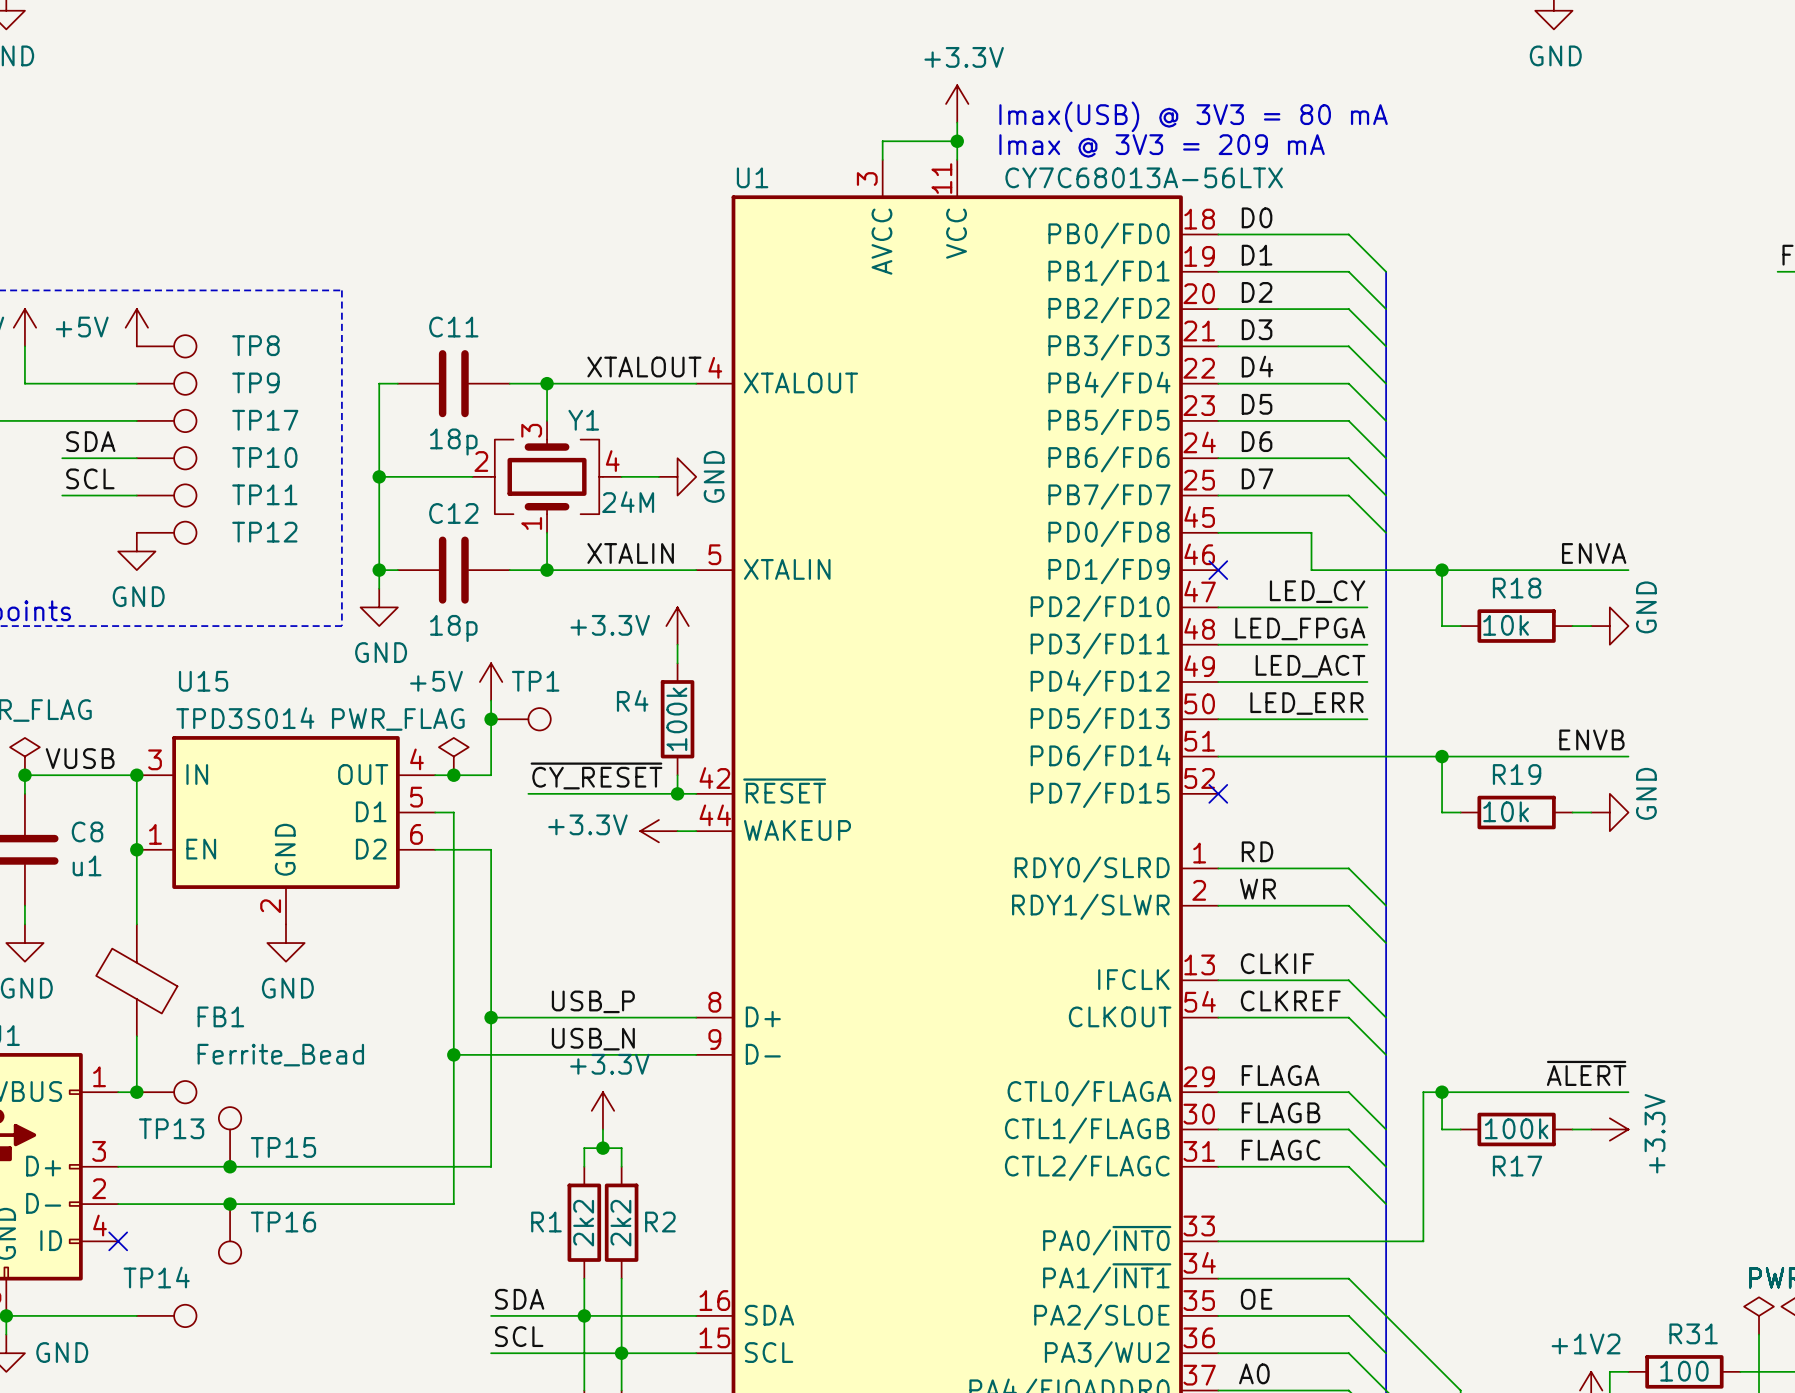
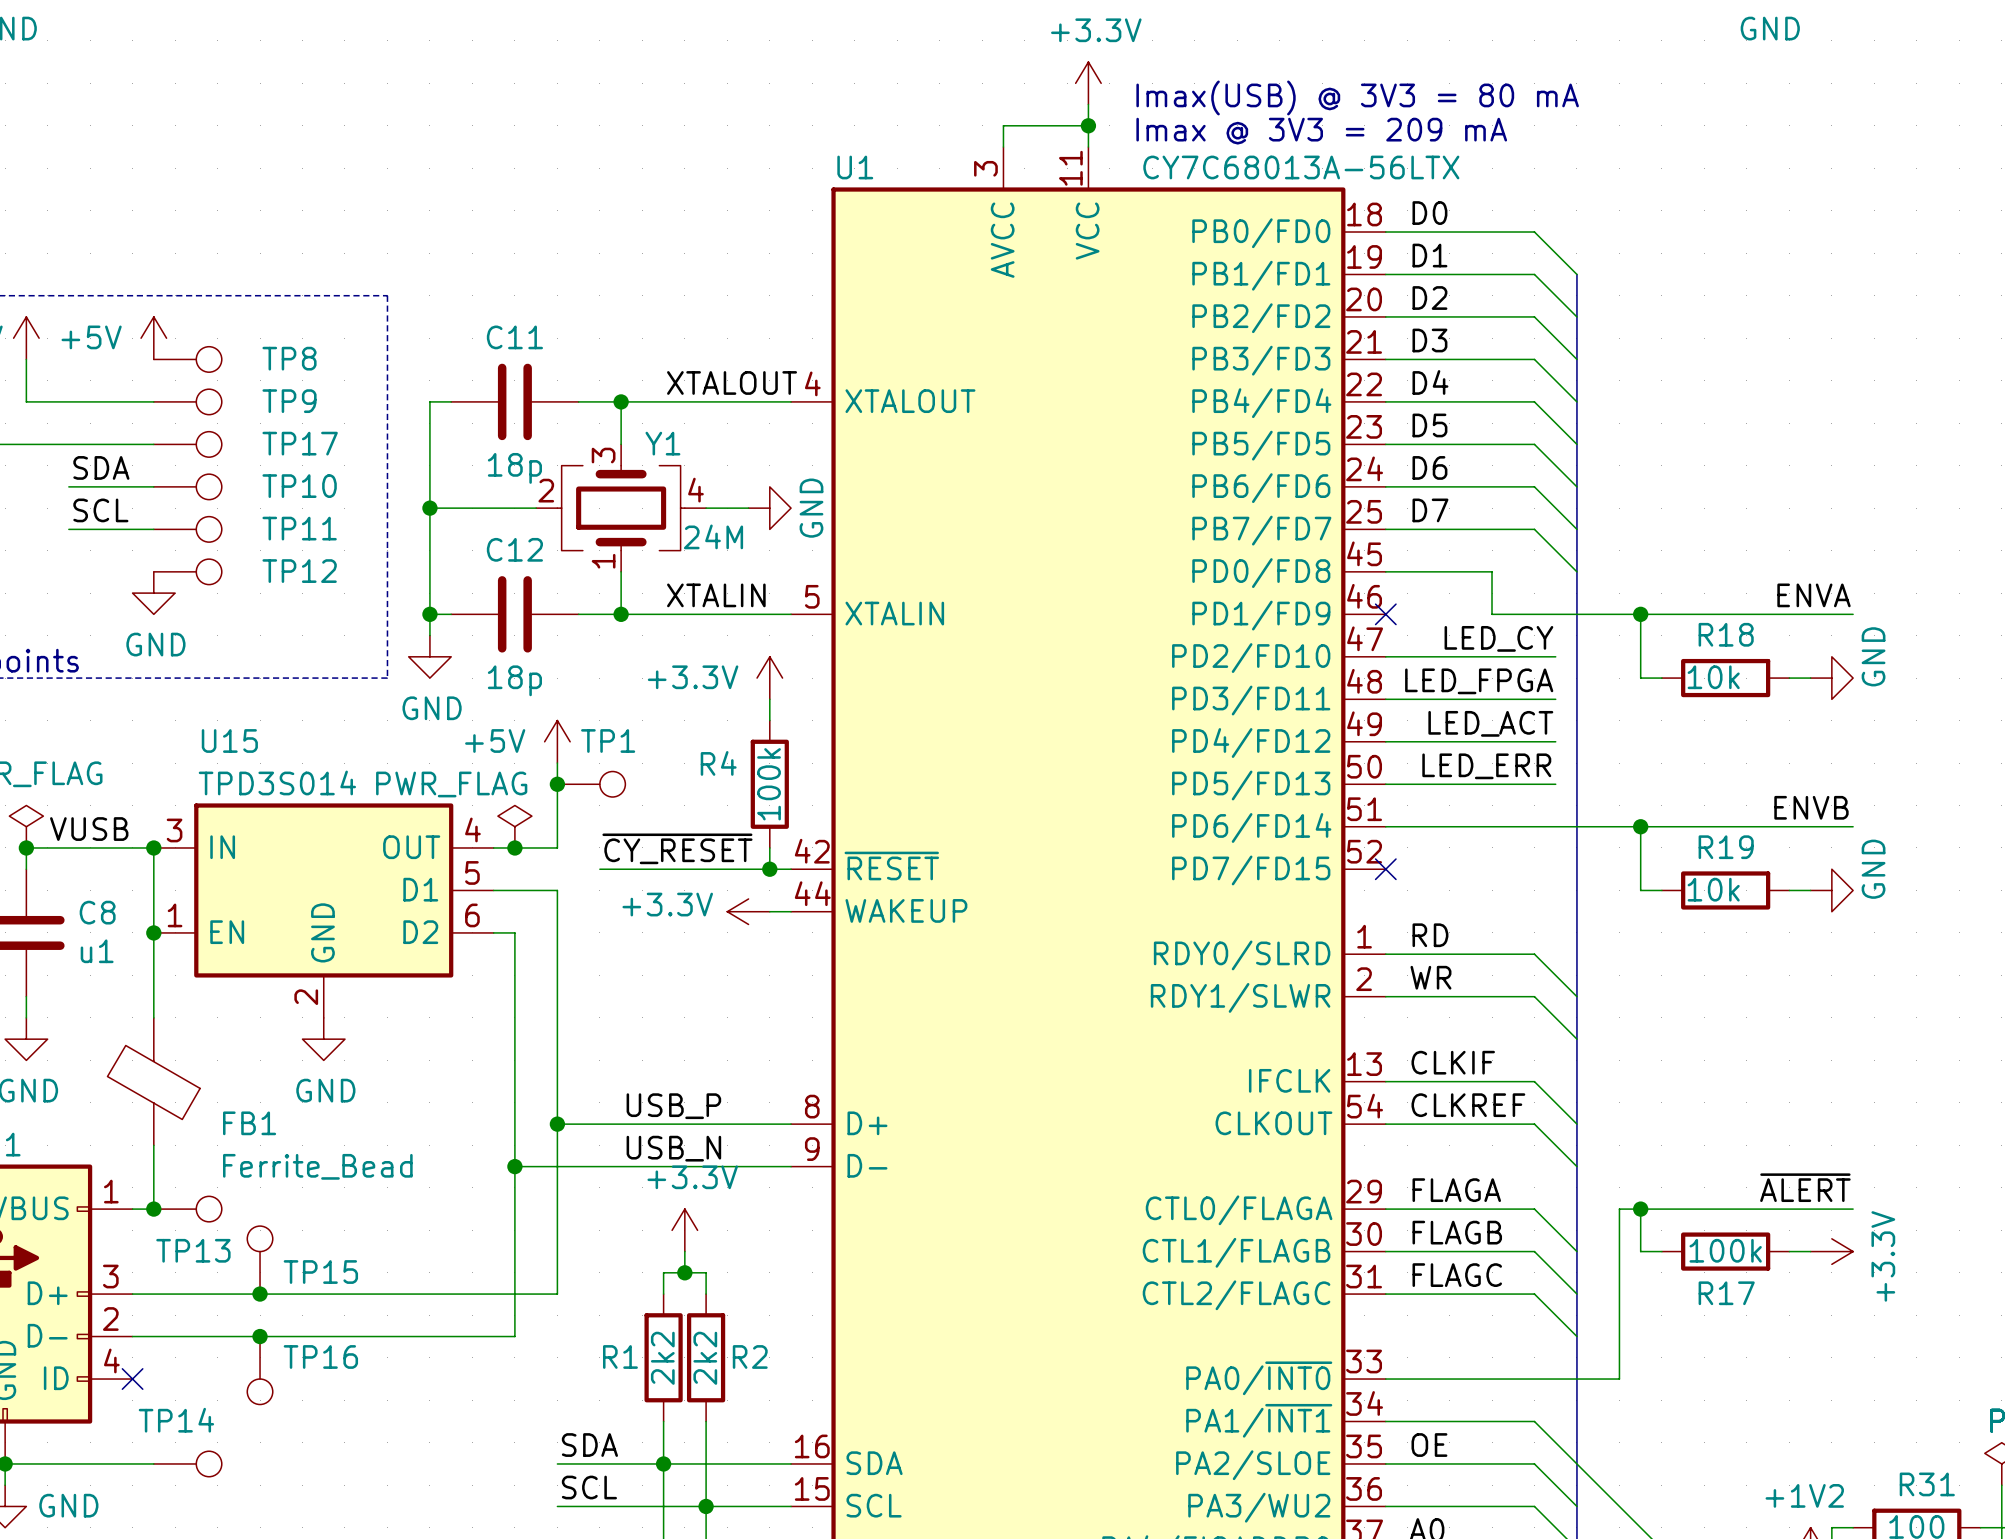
wire: (453, 812) (453, 849) (491, 849) -> (514, 890) (557, 890) (557, 932)

